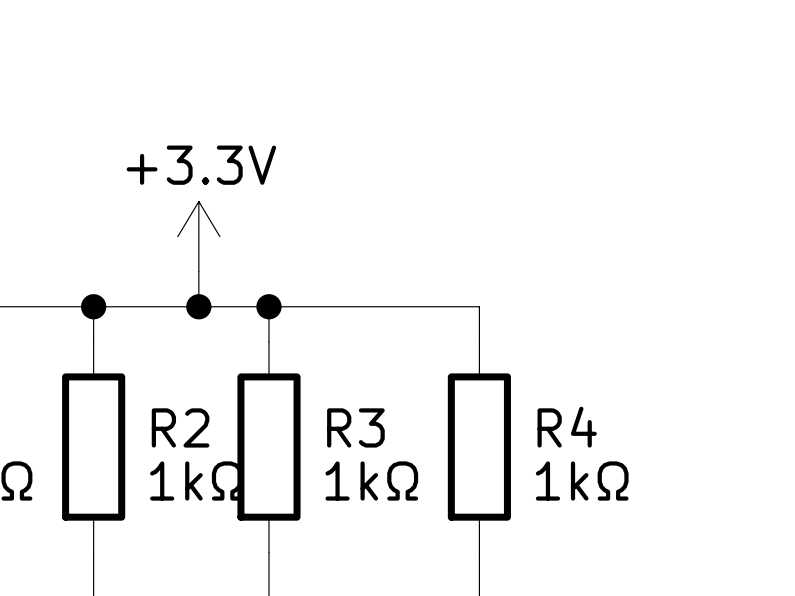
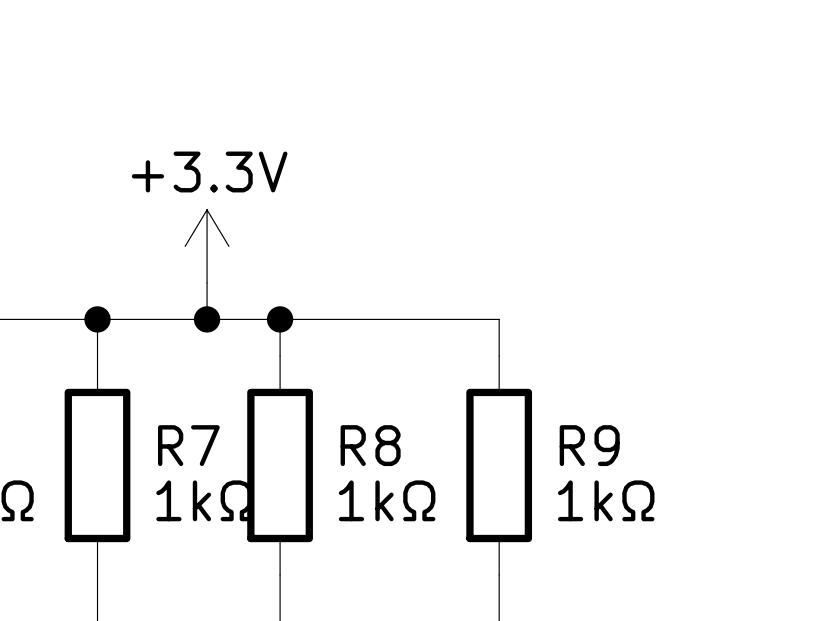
R2 name: R2 (180, 427) -> R7 (188, 445)
R3 name: R3 (355, 427) -> R8 (370, 445)
R4 name: R4 (567, 427) -> R9 (589, 445)

